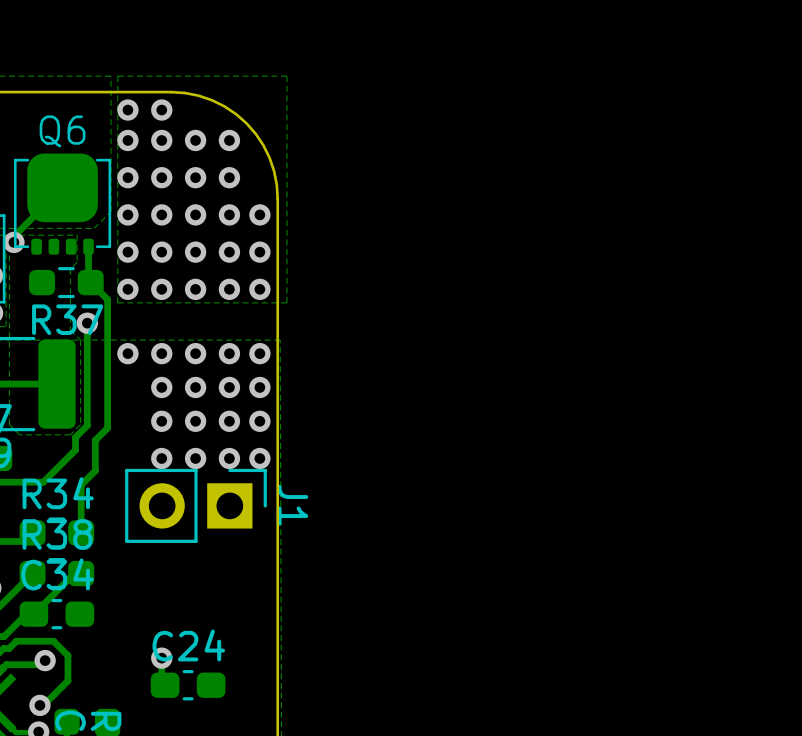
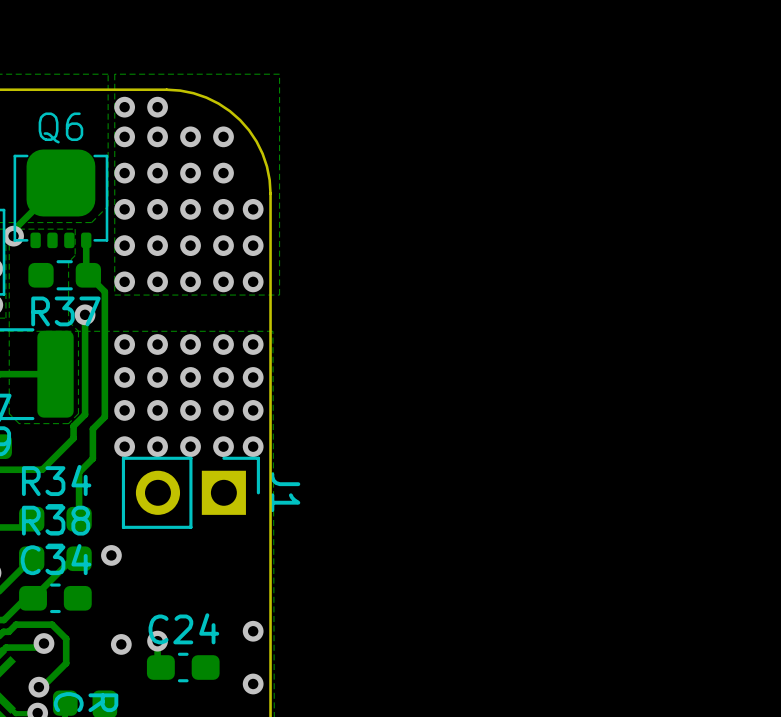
via: none -> (124, 377)
via: none -> (124, 410)
via: none -> (124, 446)
via: none -> (111, 555)
via: none -> (253, 631)
via: none -> (121, 644)
via: none -> (253, 683)

